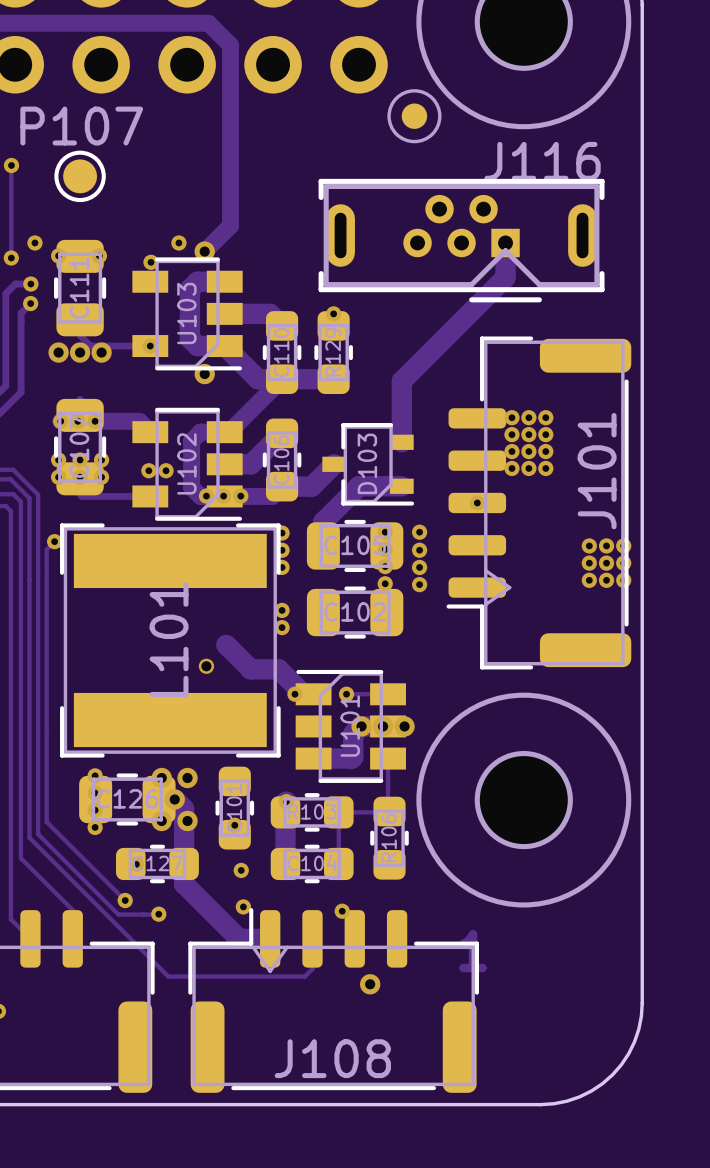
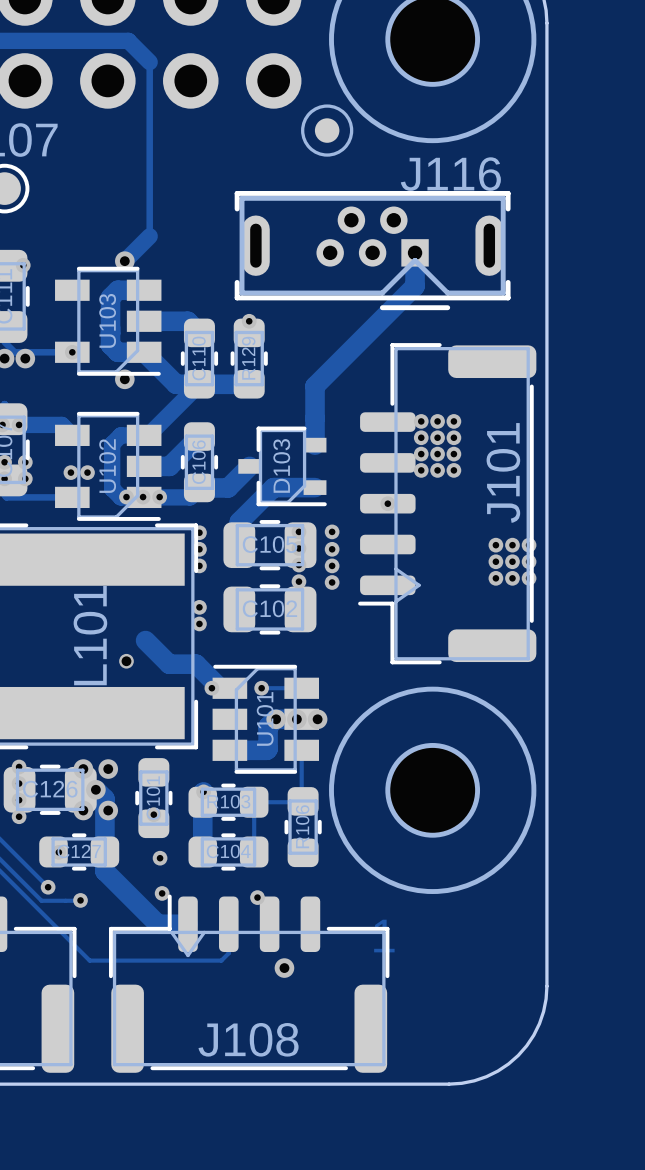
track width: thick (230, 45) (230, 225) -> thin (149, 62) (149, 236)
via: (178, 242) -> none
via: (151, 262) -> none

